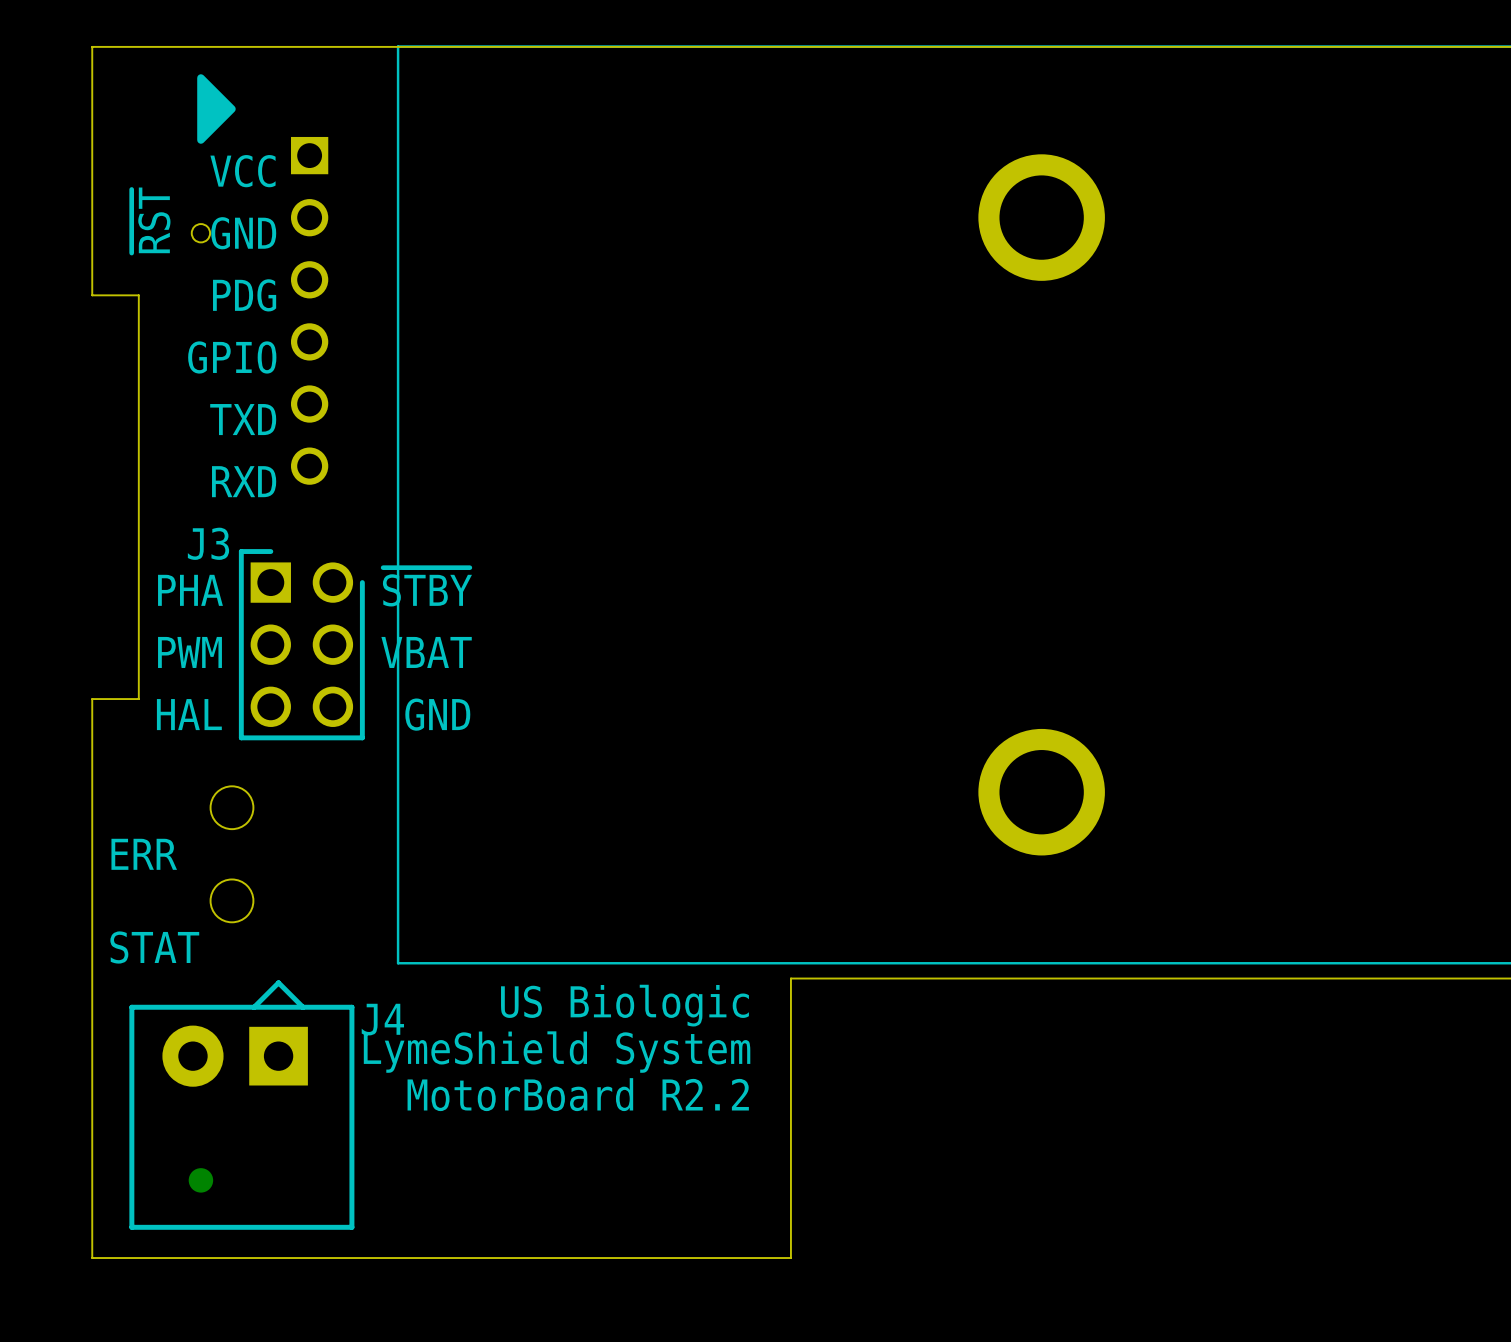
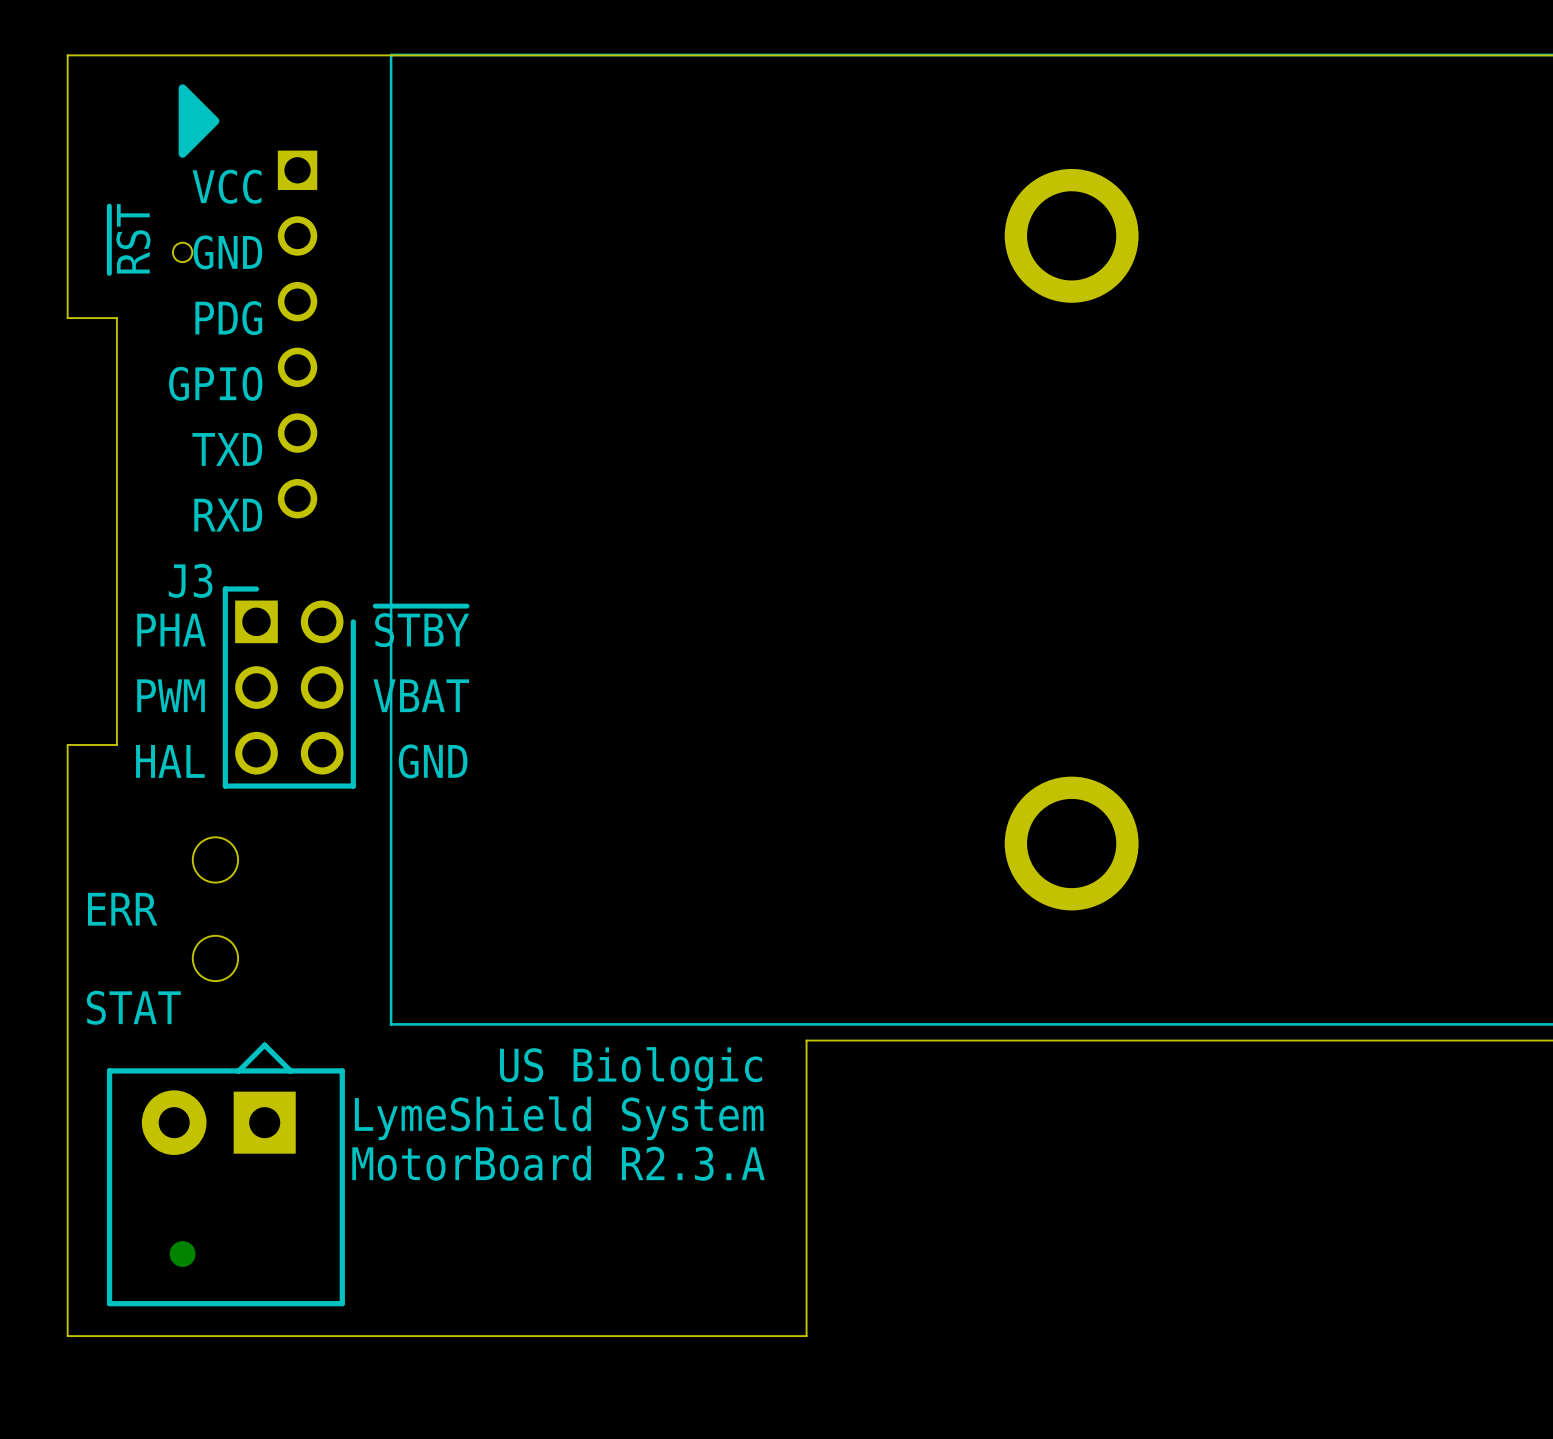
J4 name: J4 (382, 1019) -> none
text: MotorBoard R2.2 (578, 1094) -> MotorBoard R2.3.A (558, 1163)

